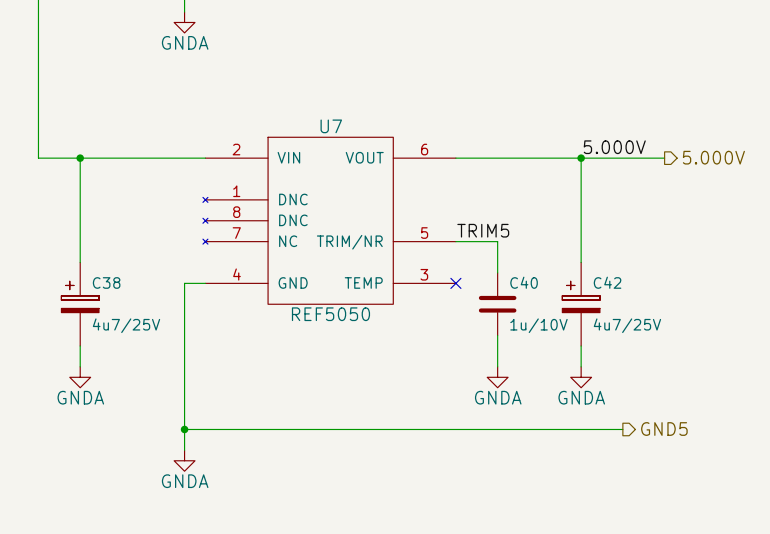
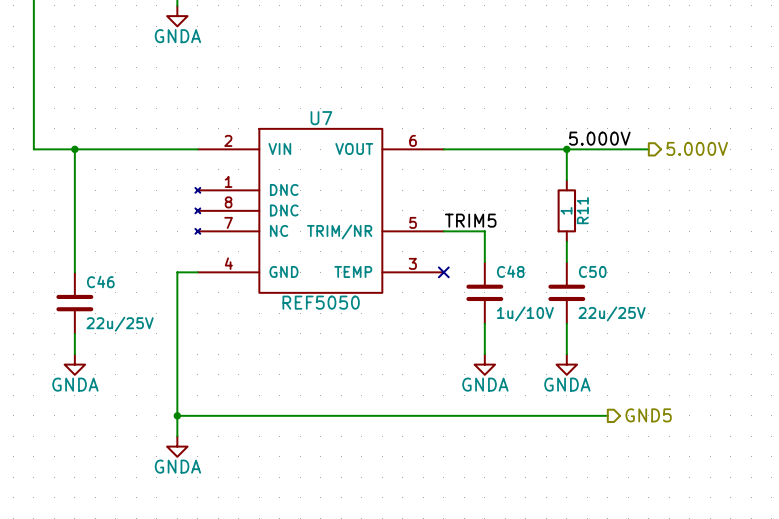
wire: (581, 189) (581, 252) -> none
R11: none -> 1 (566, 210)
C40 name: C40 (524, 282) -> C48 (510, 271)
C38: 4u7/25V (80, 304) -> none
C42: 4u7/25V (581, 304) -> none
C50: none -> 22u/25V (566, 292)
C46: none -> 22u/25V (74, 303)

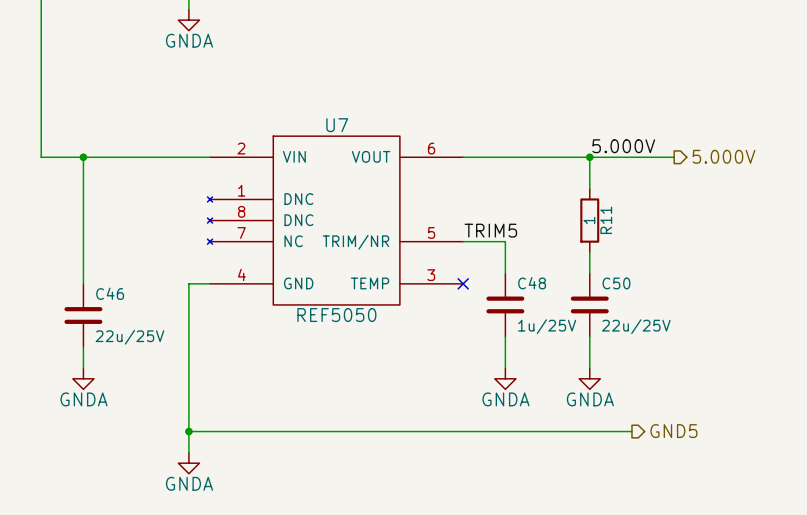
C48 value: 1u/10V (525, 313) -> 1u/25V (547, 326)

